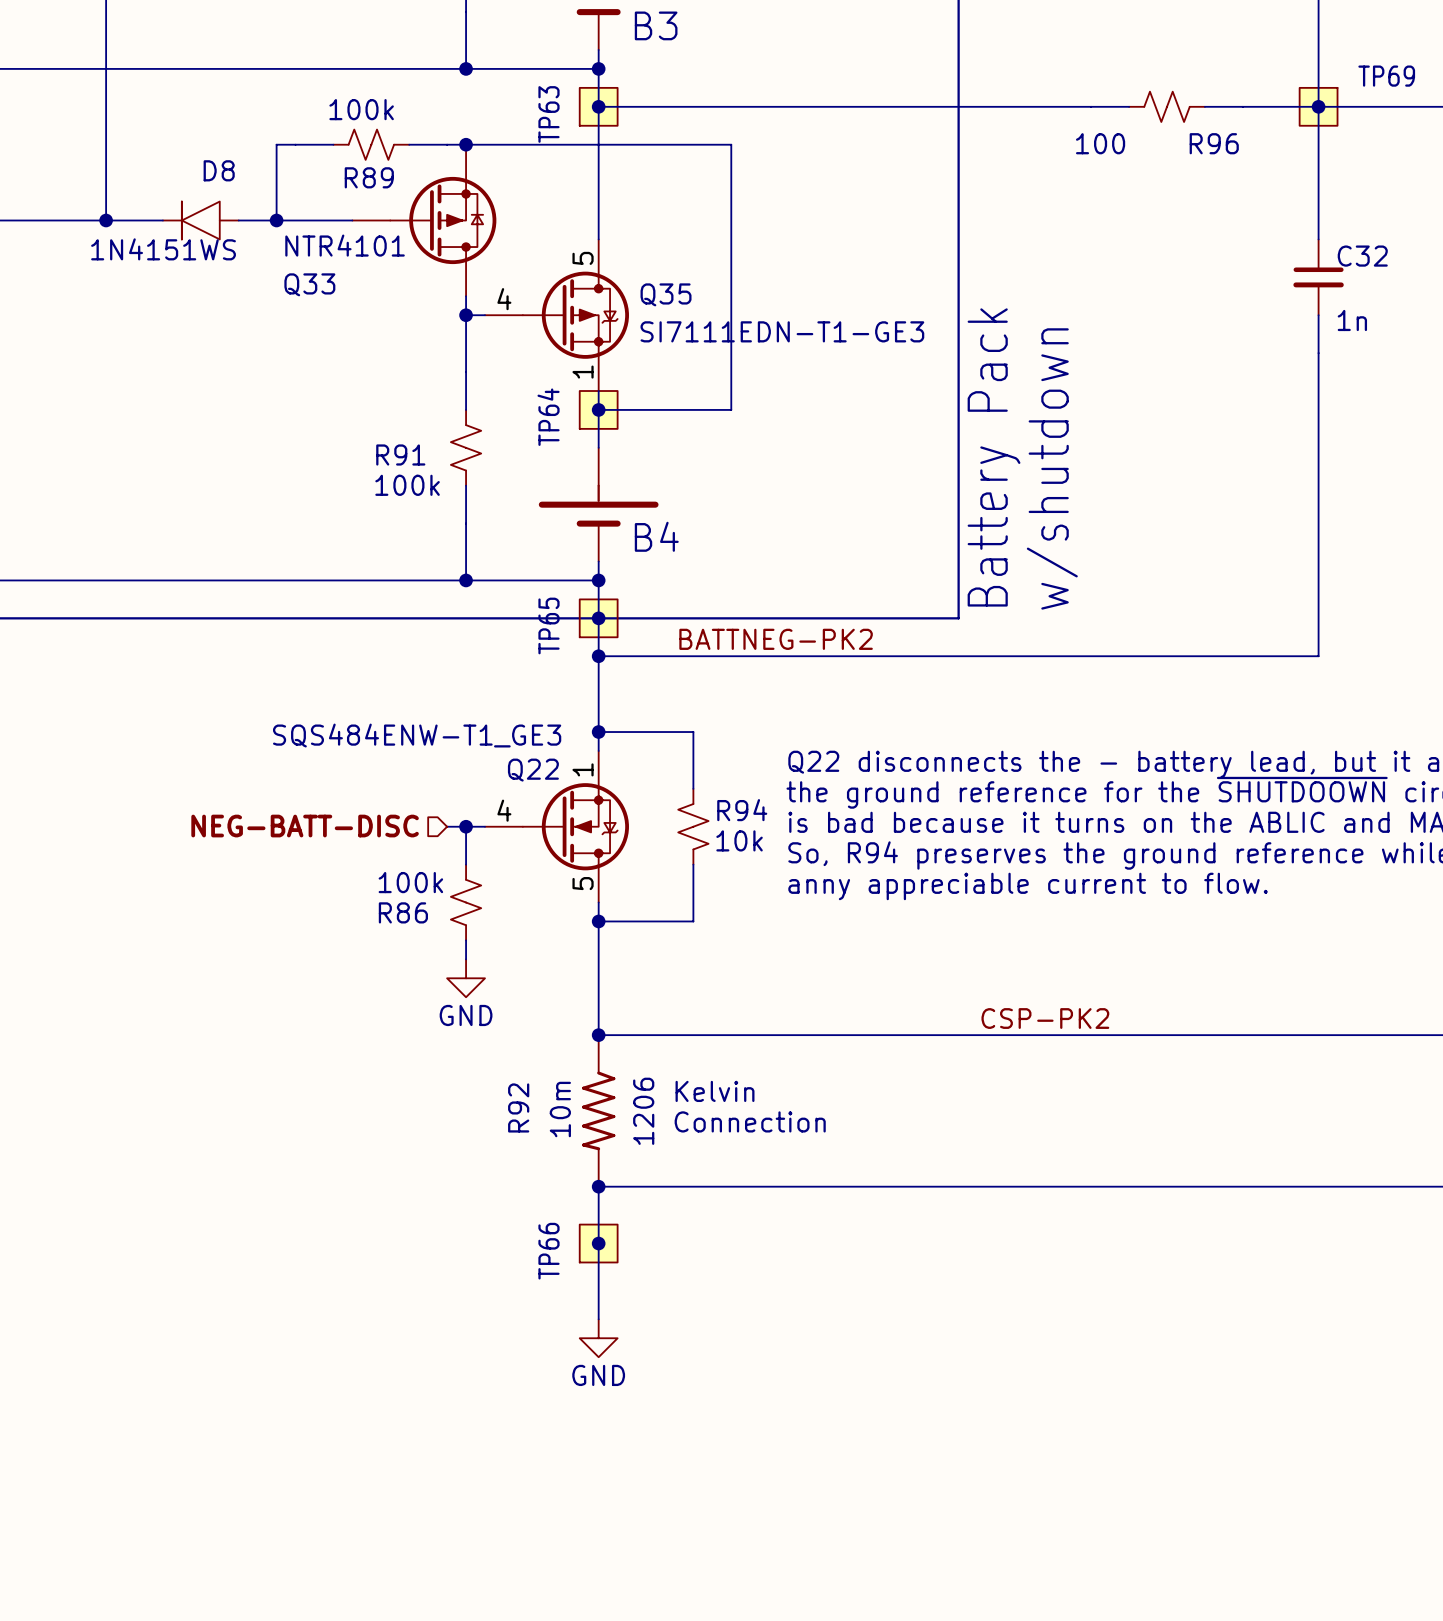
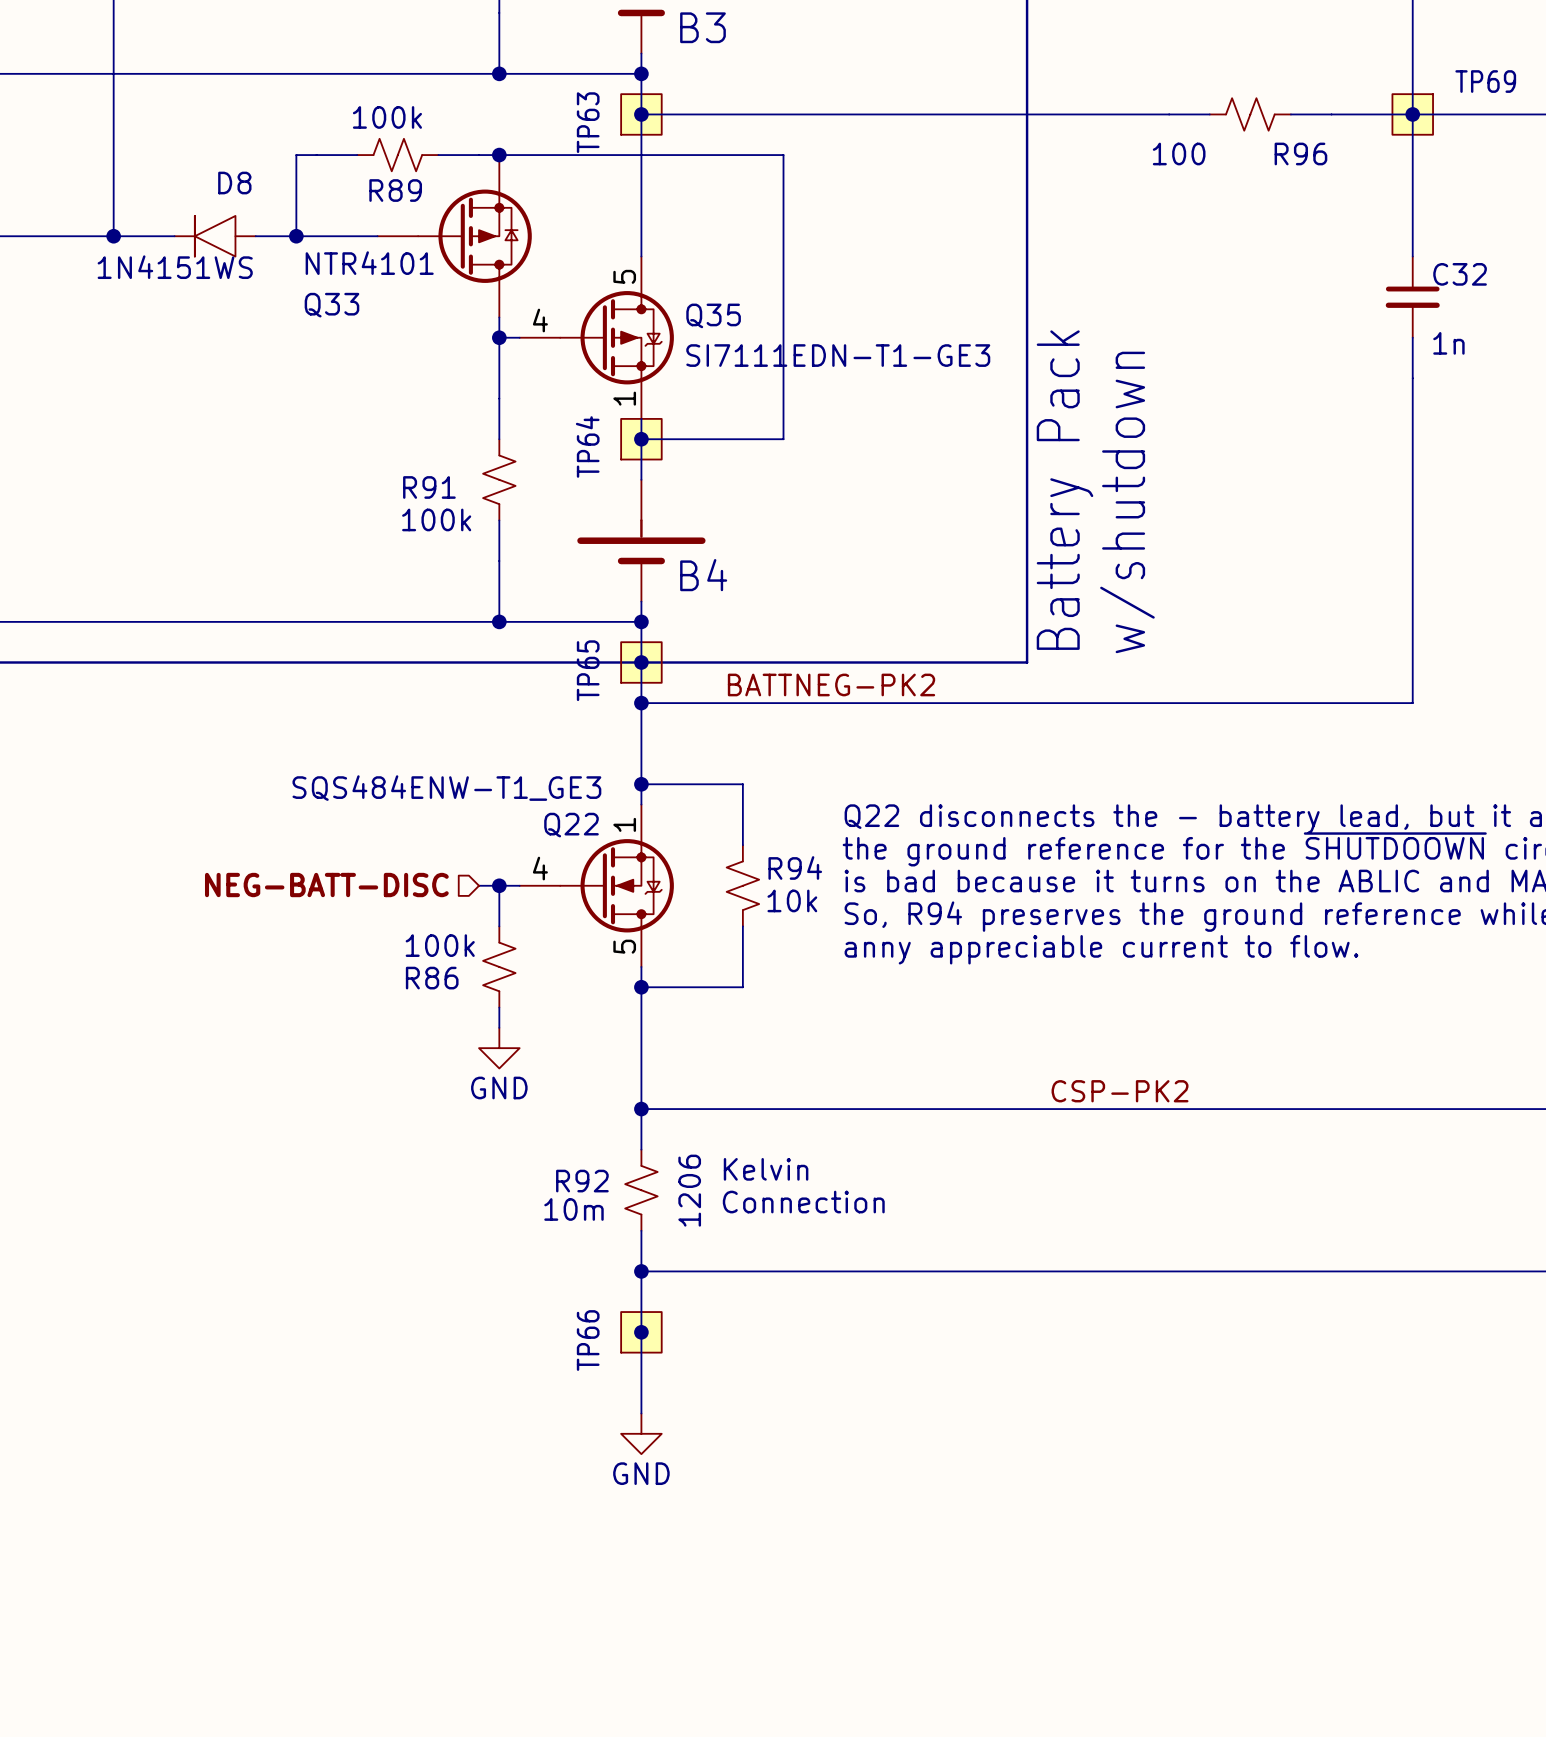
R92 symbol: [581, 1035, 616, 1187] -> [625, 1149, 658, 1231]
R92 value position: 10m (560, 1109) -> 10m (573, 1209)

